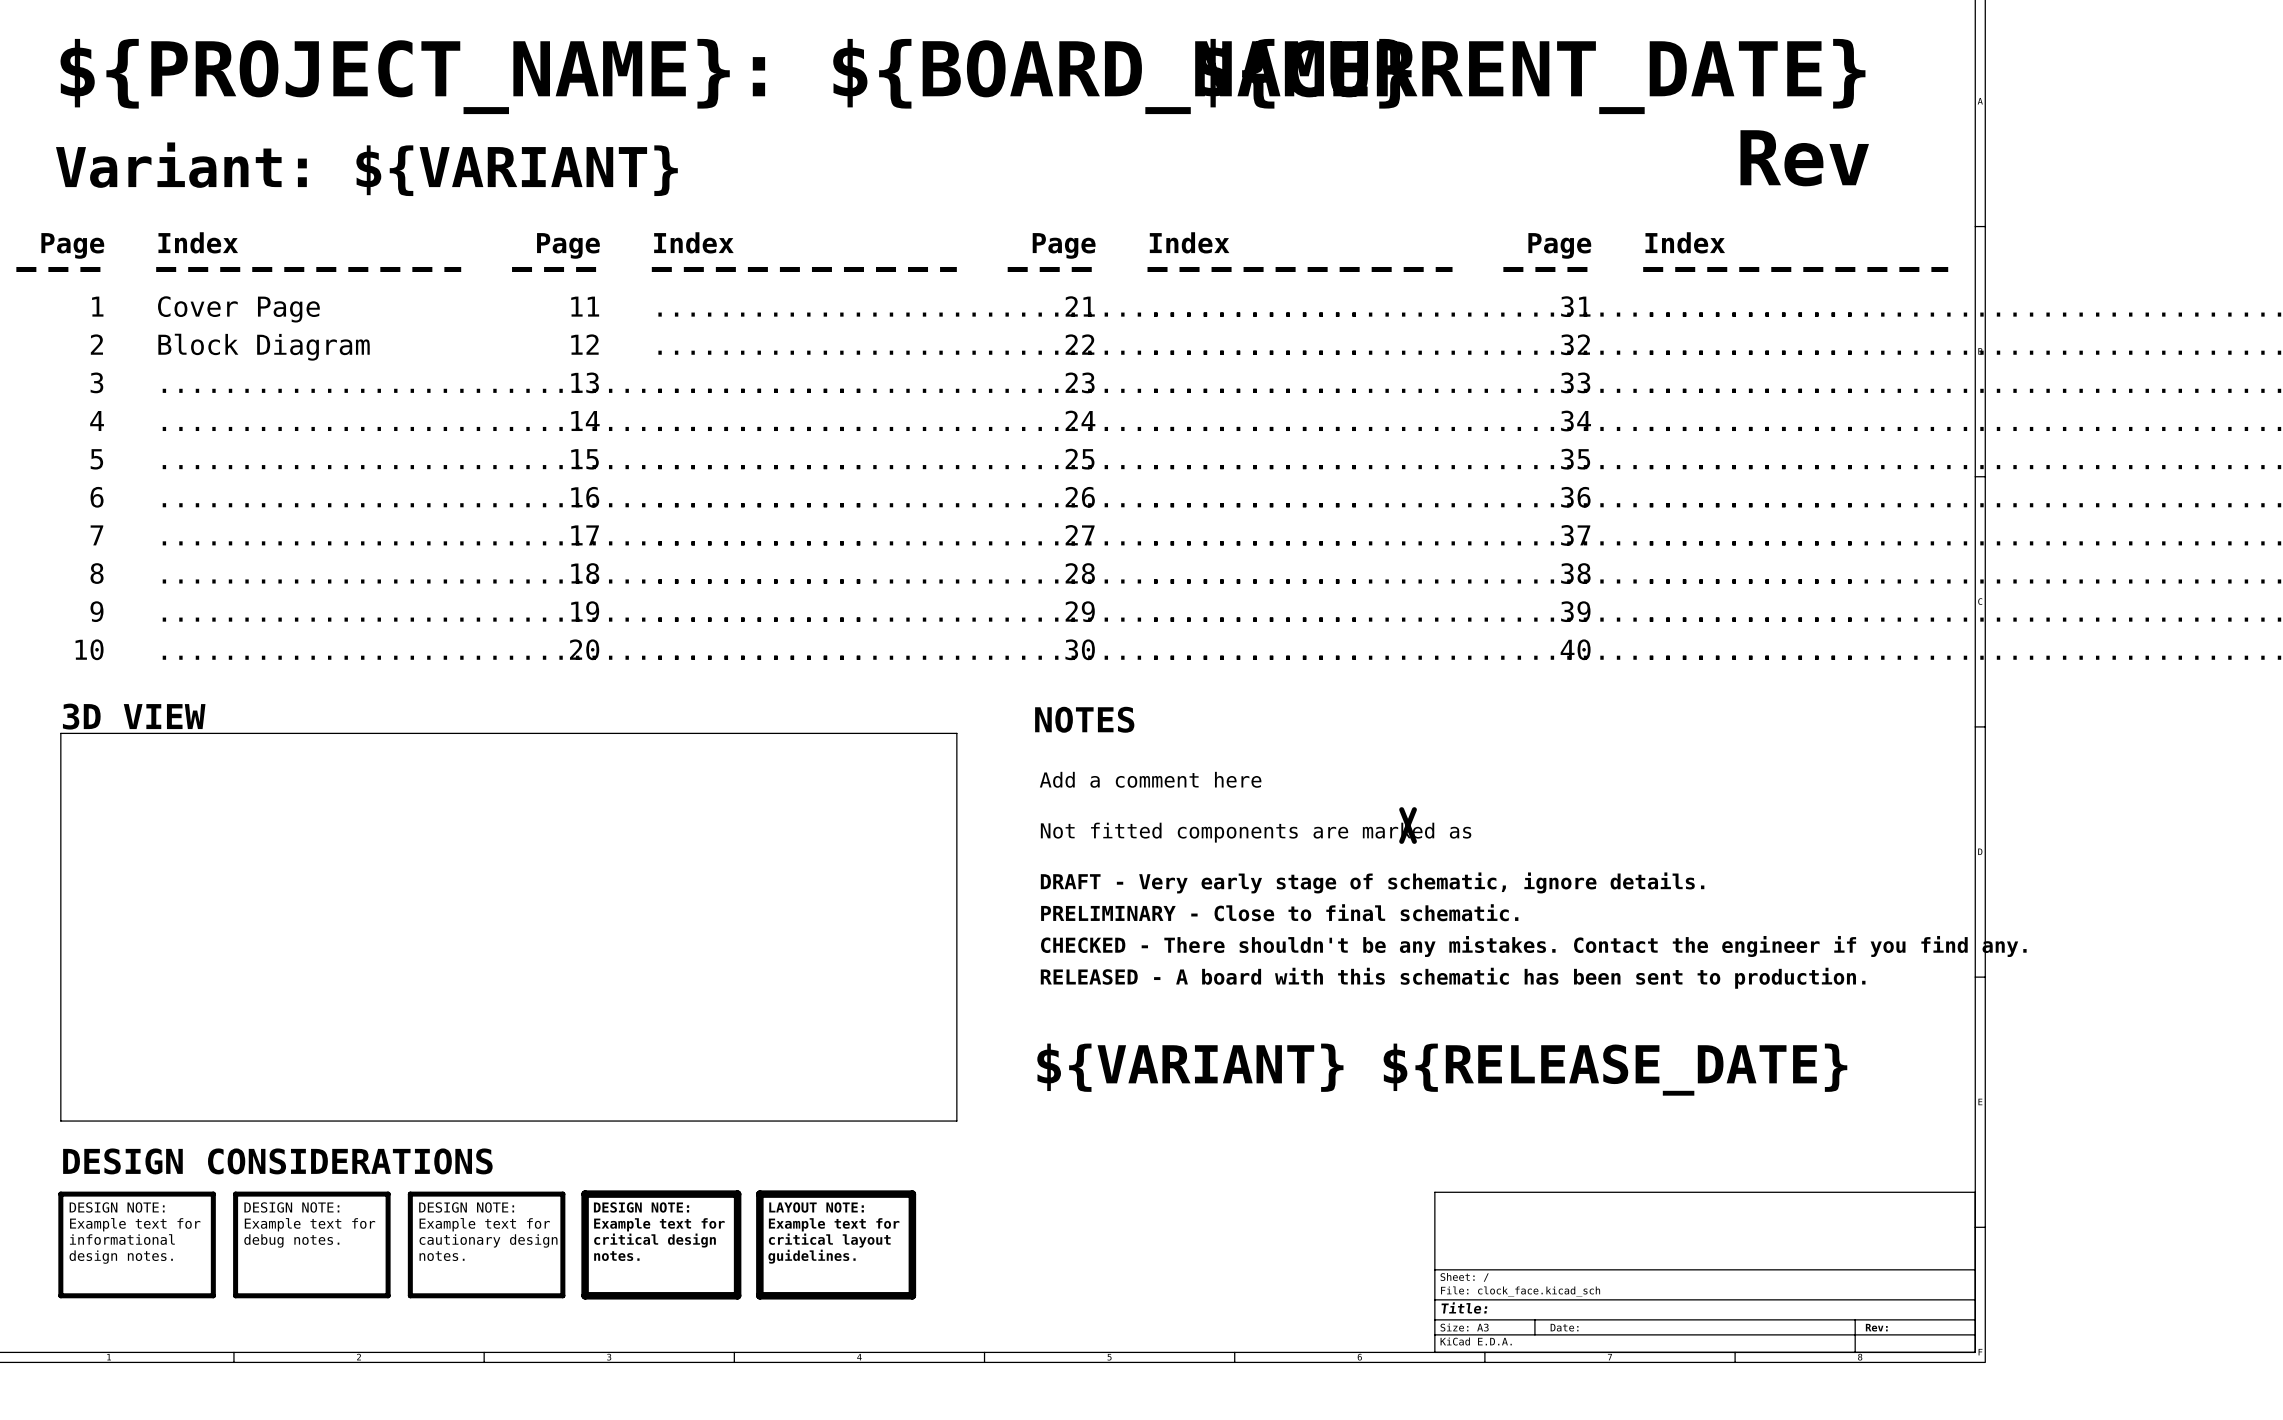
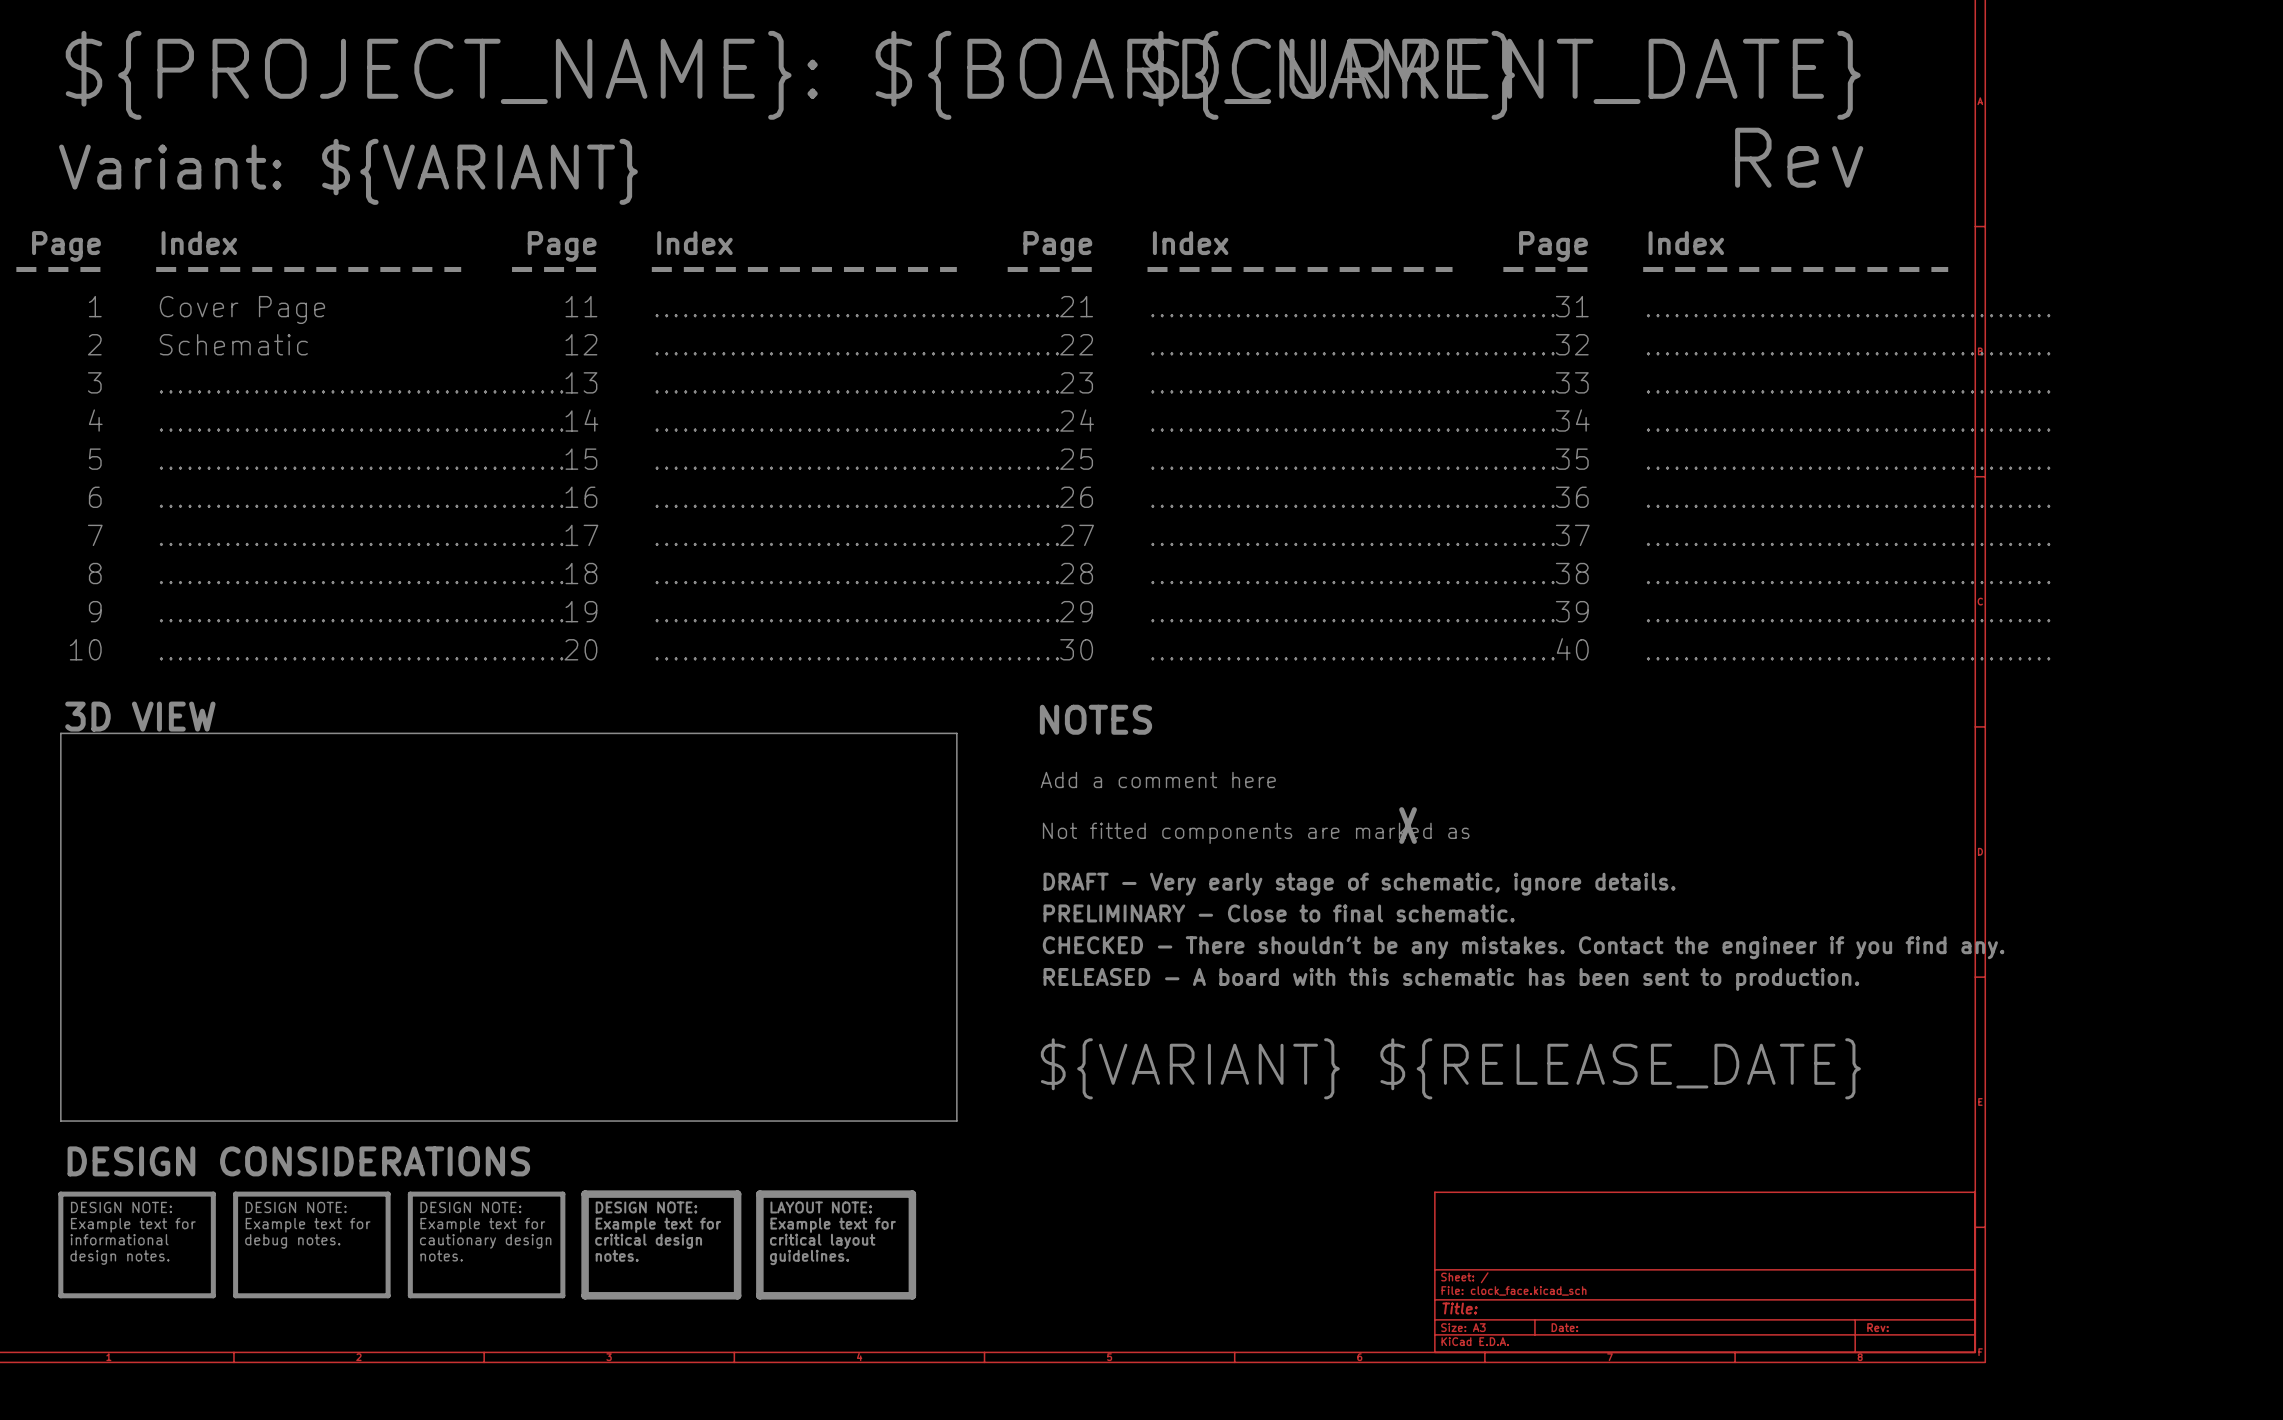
text: Block Diagram (264, 347) -> Schematic (233, 344)

